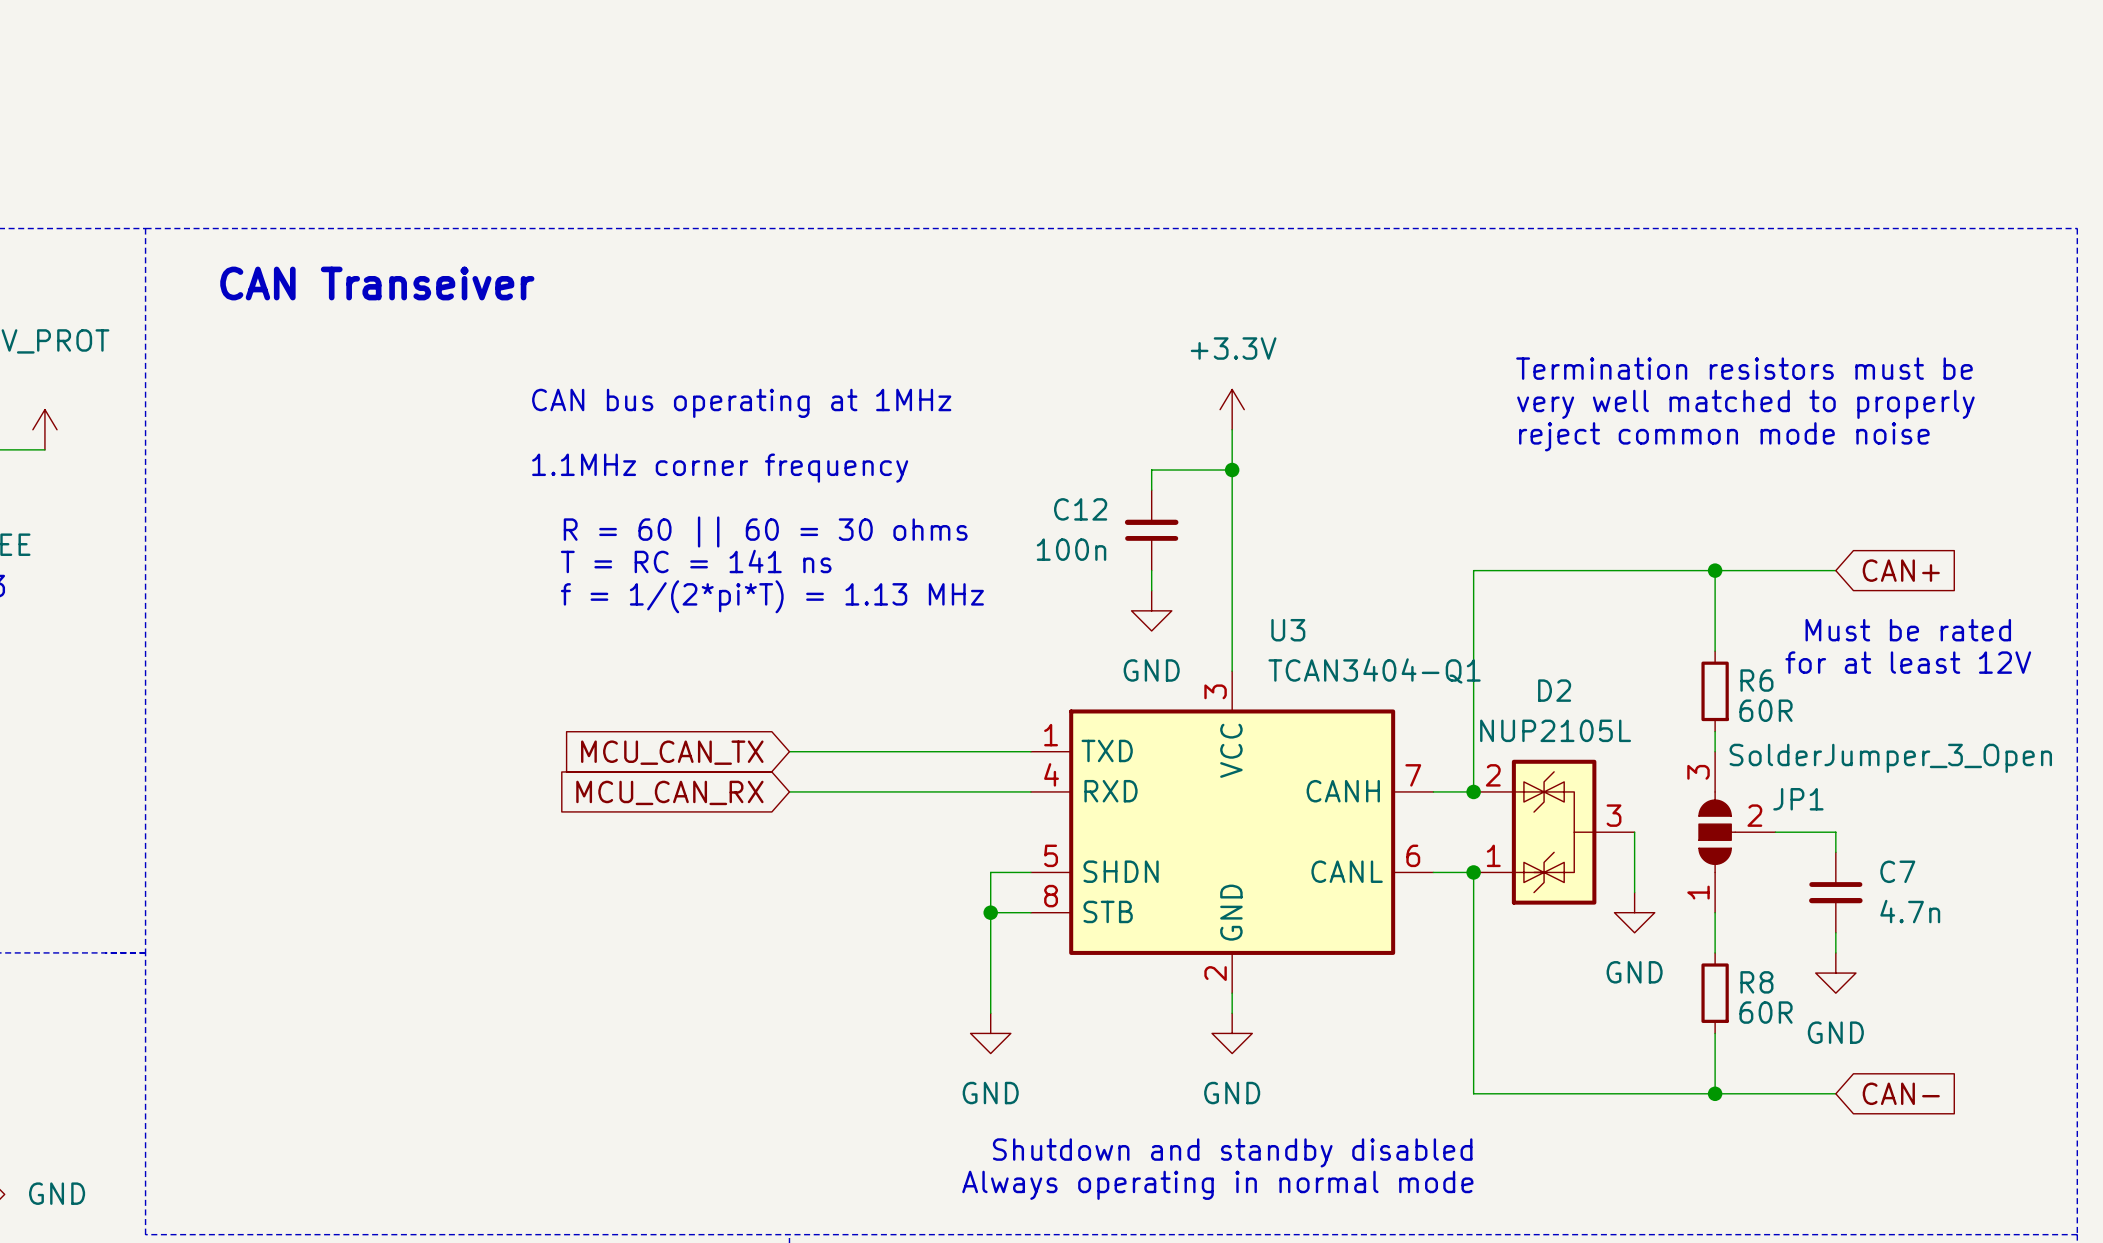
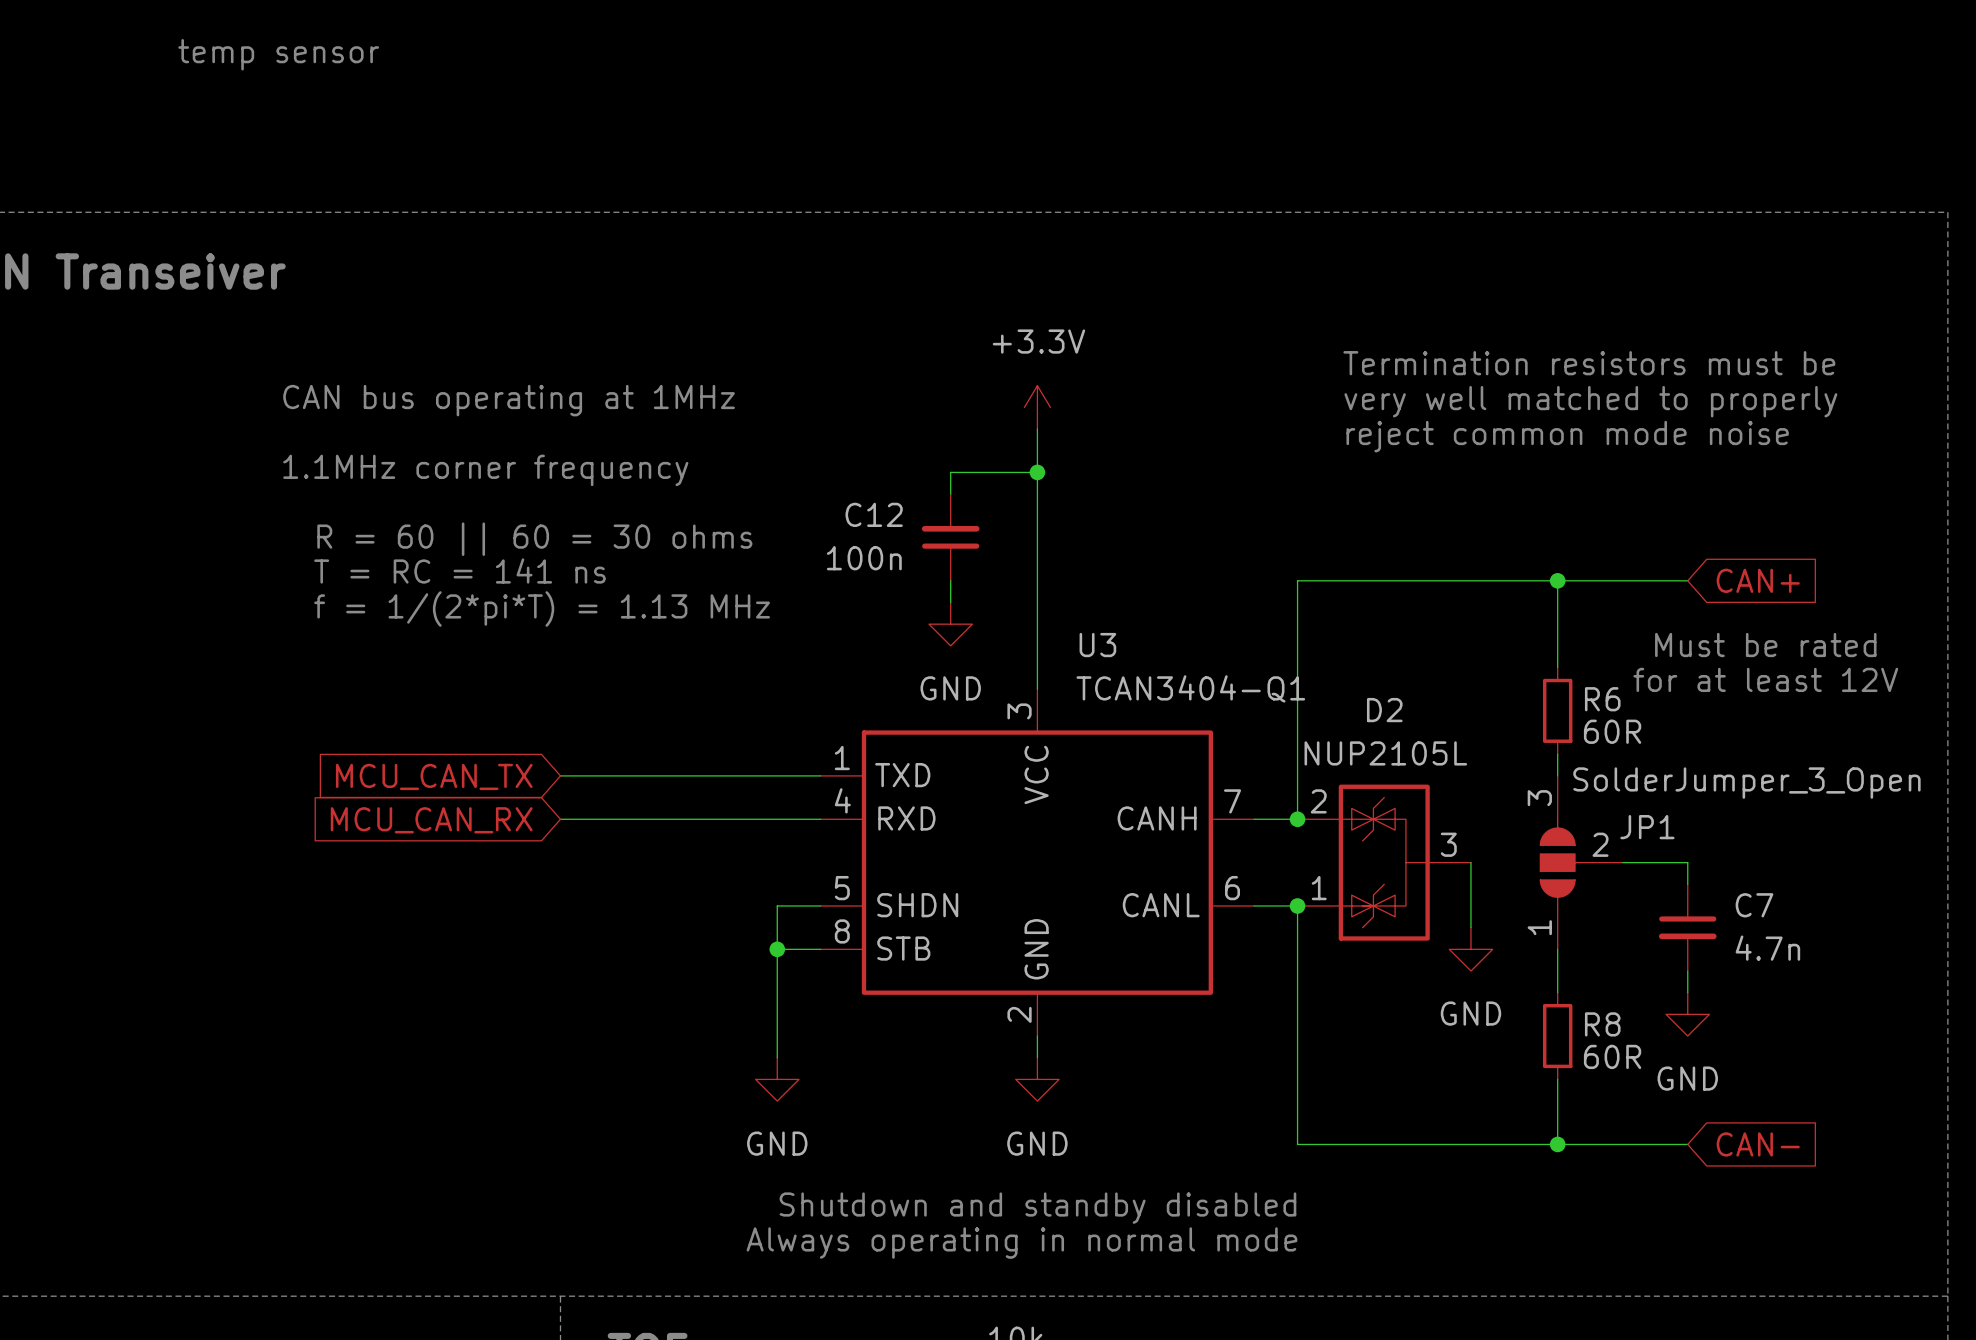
text: none -> temp sensor (278, 54)

